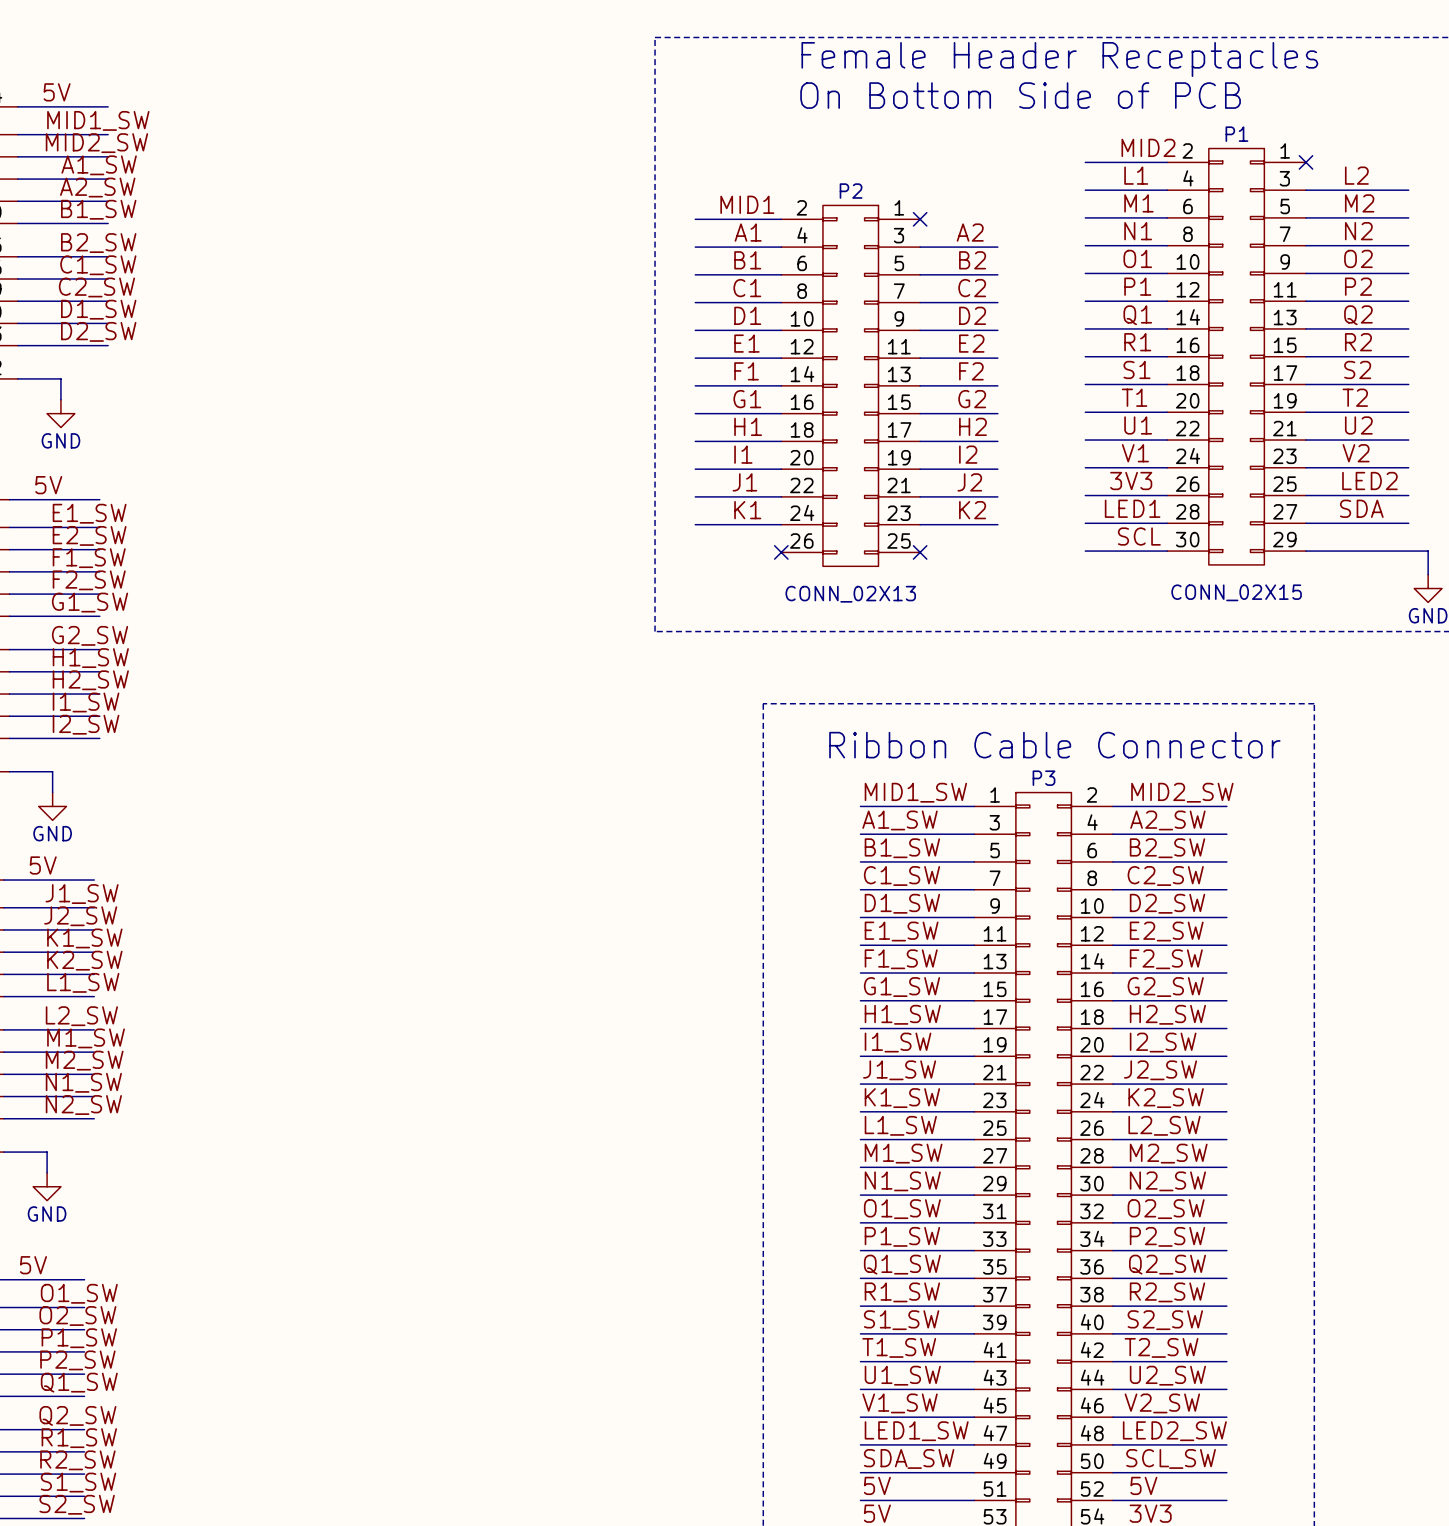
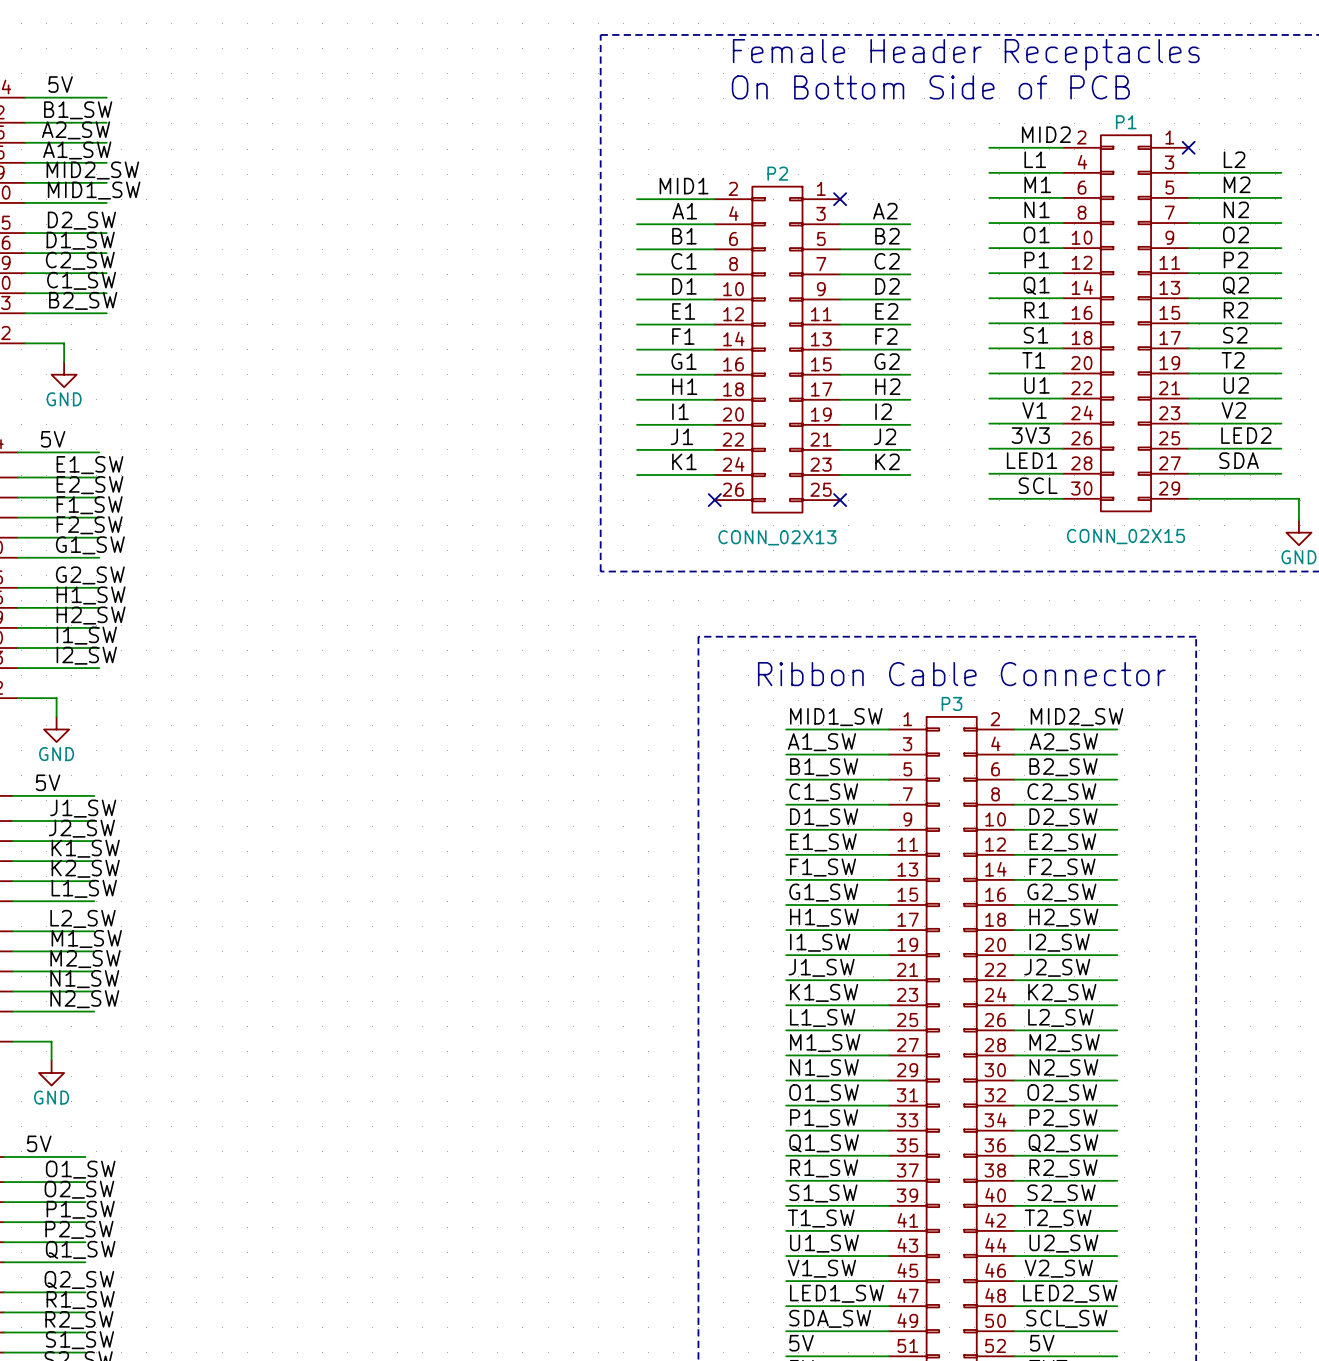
label position: MID1_SW (98, 120) -> MID1_SW (94, 190)
label position: MID2_SW (96, 143) -> MID2_SW (92, 170)
label position: A1_SW (99, 165) -> A1_SW (77, 150)
label position: A2_SW (97, 187) -> A2_SW (76, 130)
label position: B1_SW (98, 209) -> B1_SW (78, 110)
label position: B2_SW (98, 243) -> B2_SW (83, 300)
label position: C1_SW (98, 265) -> C1_SW (81, 280)
label position: C2_SW (96, 287) -> C2_SW (80, 260)
label position: D1_SW (98, 309) -> D1_SW (80, 240)
label position: D2_SW (98, 331) -> D2_SW (81, 220)

